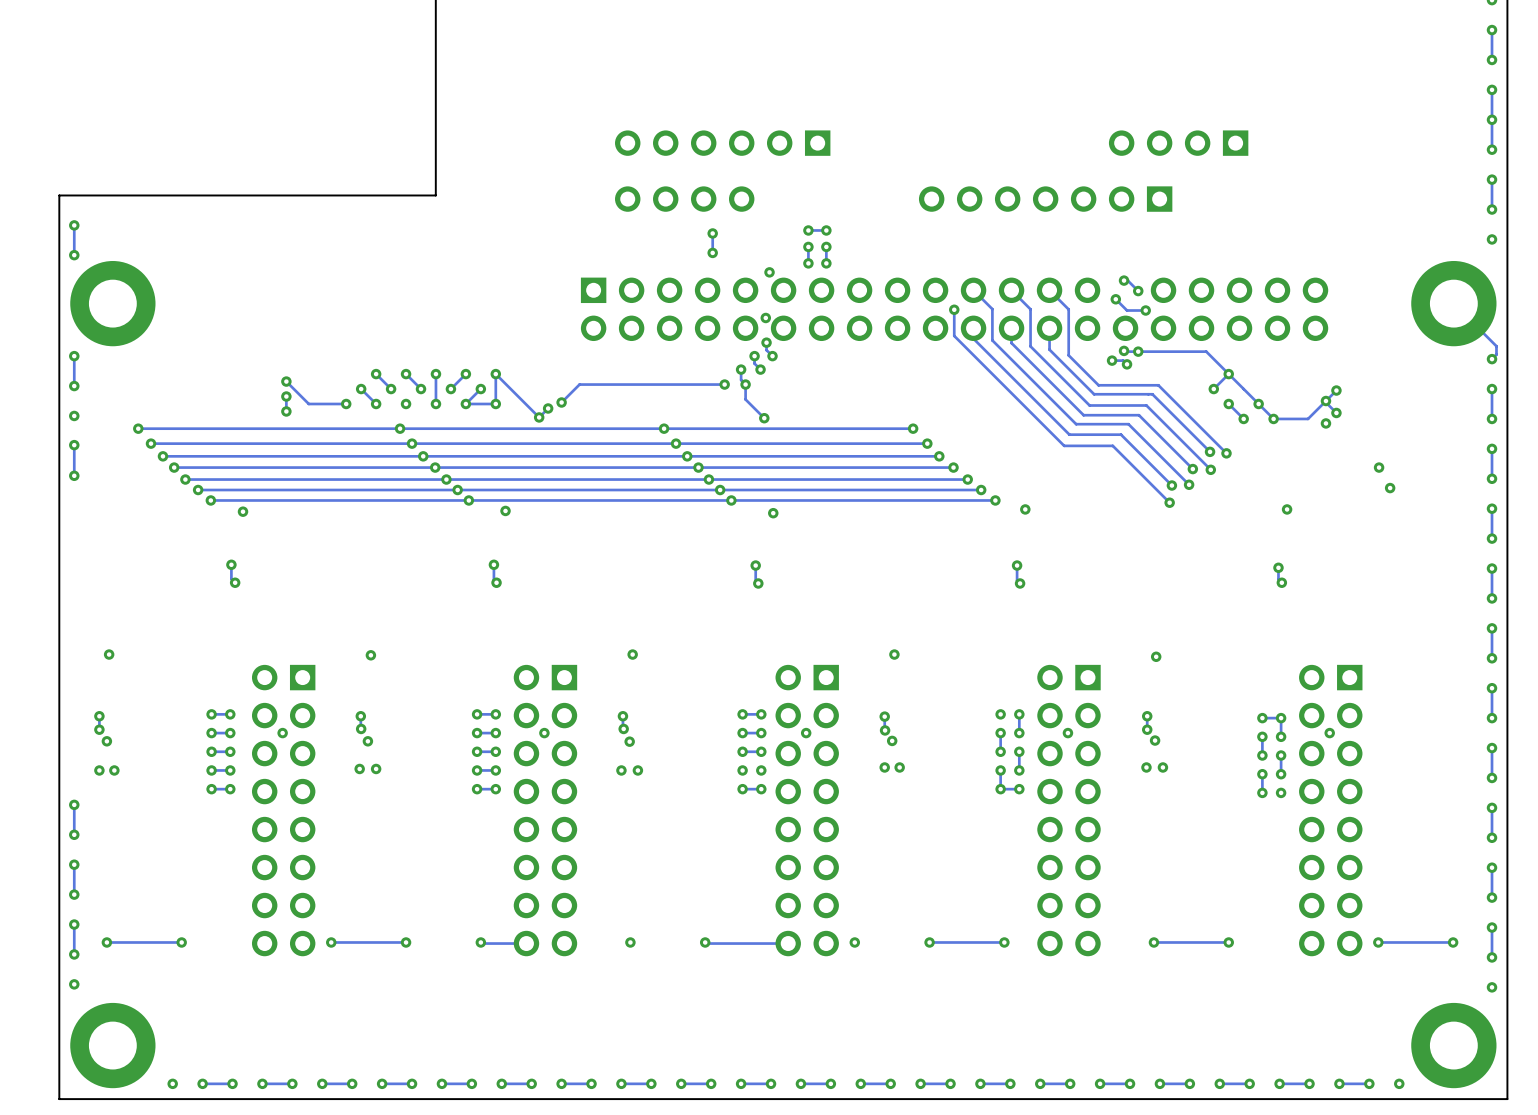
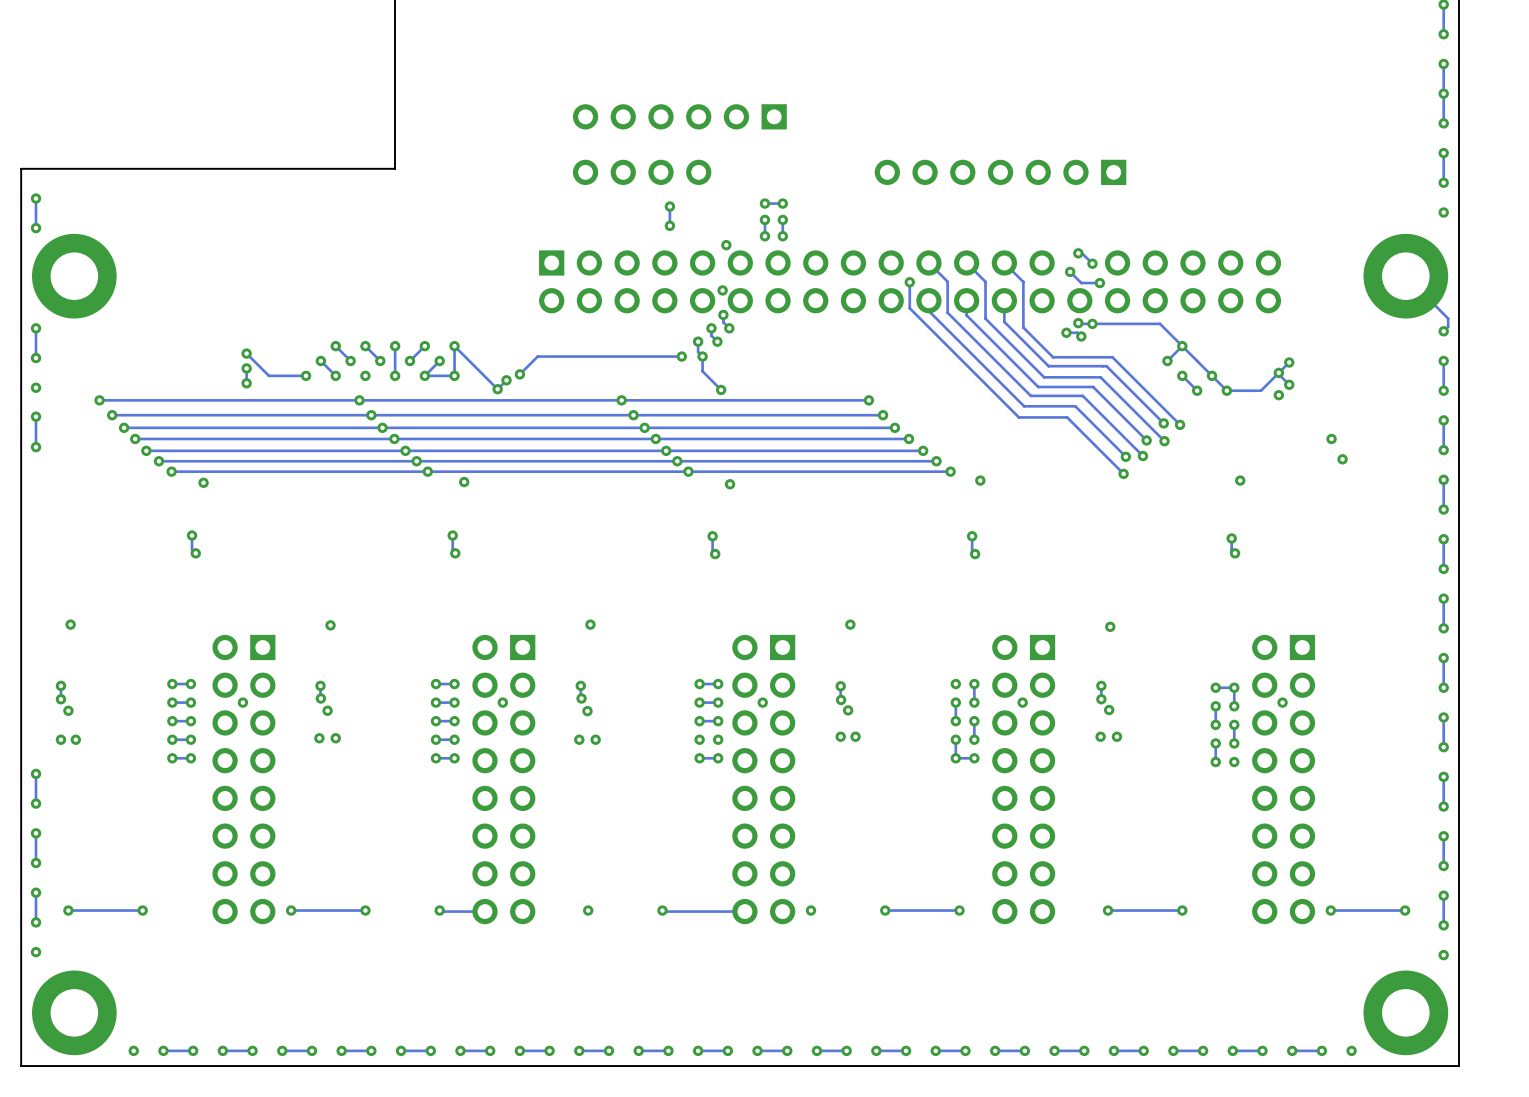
part: (1178, 143) -> none

